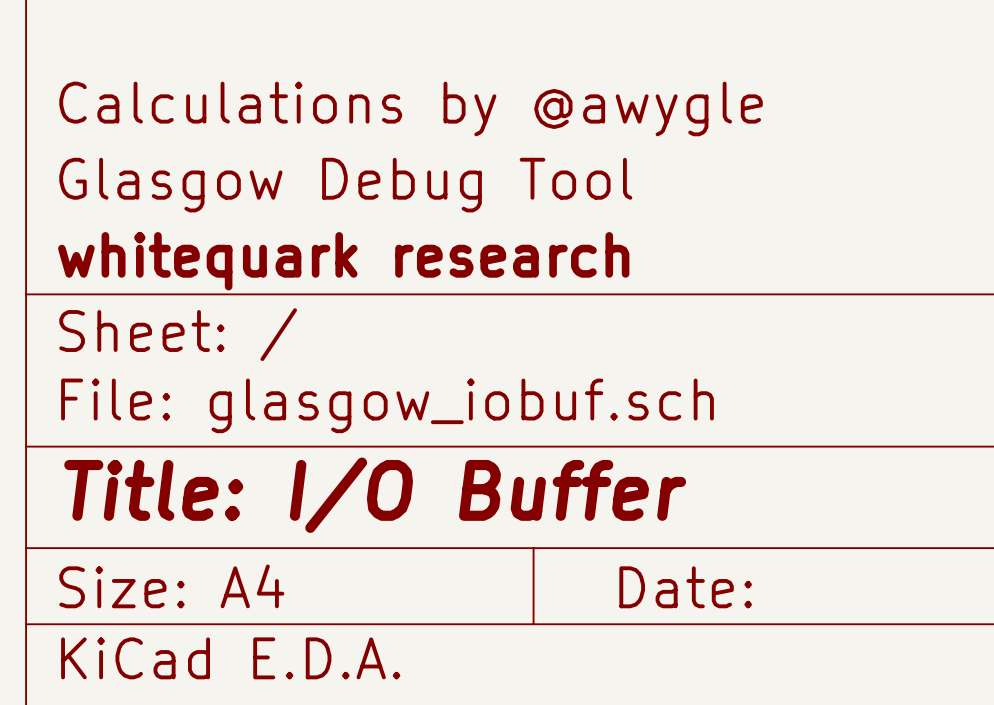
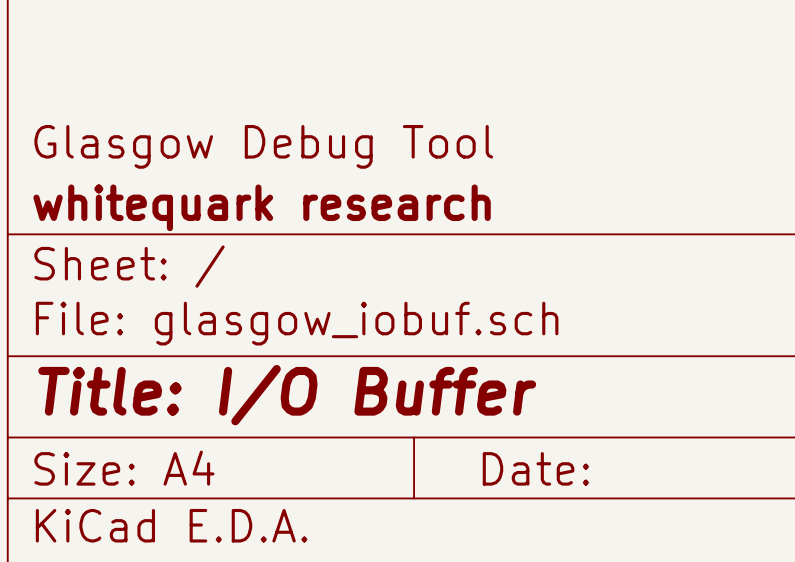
title block: Calculations by @awygle (411, 108) -> none

